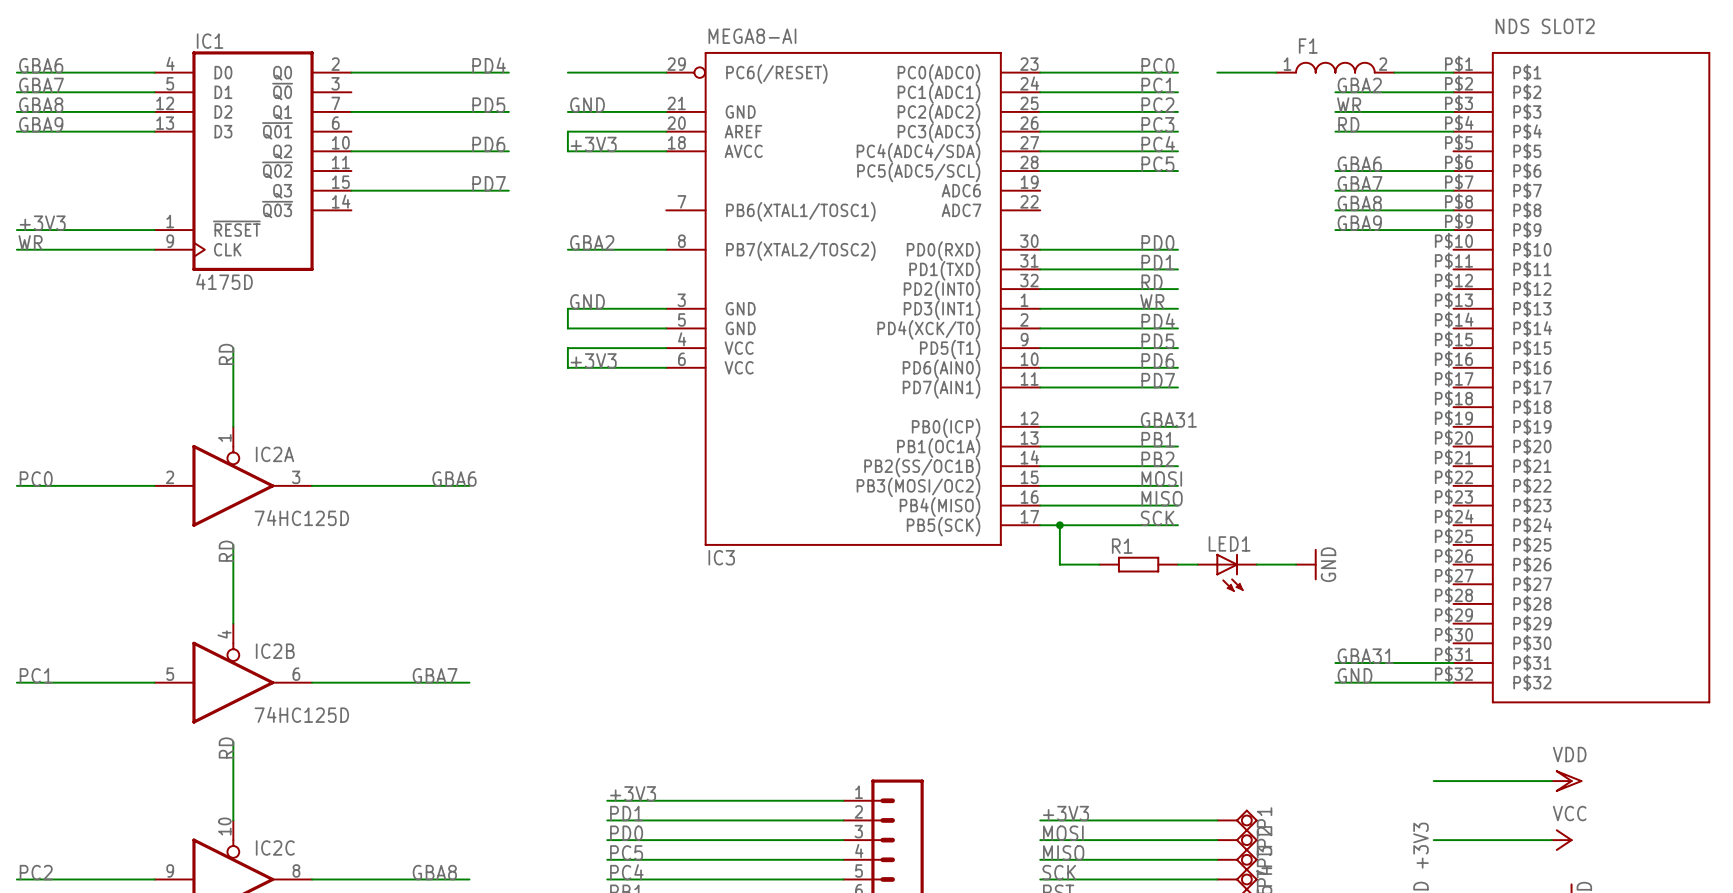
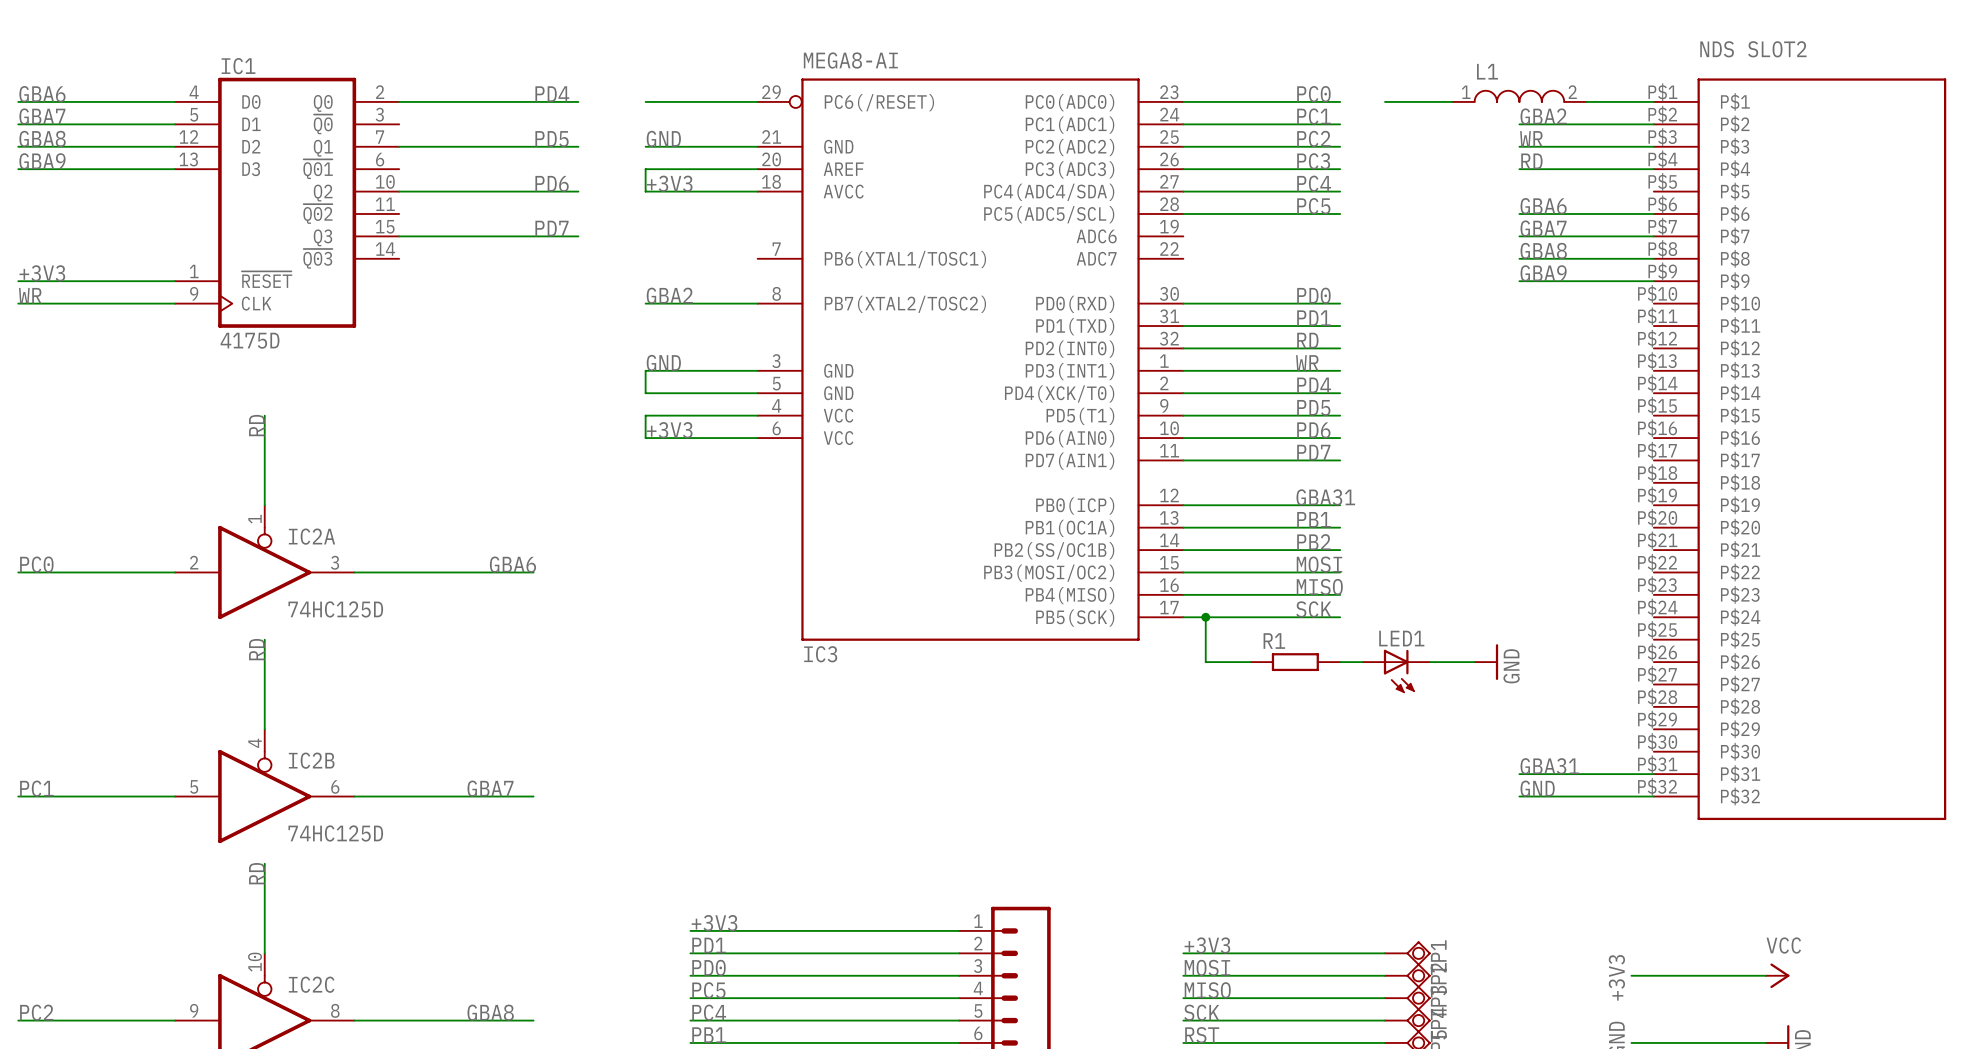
F1 name: F1 (1308, 46) -> L1 (1487, 71)
wire: (1433, 781) (1551, 781) -> none
power symbol: VDD (1567, 781) -> none

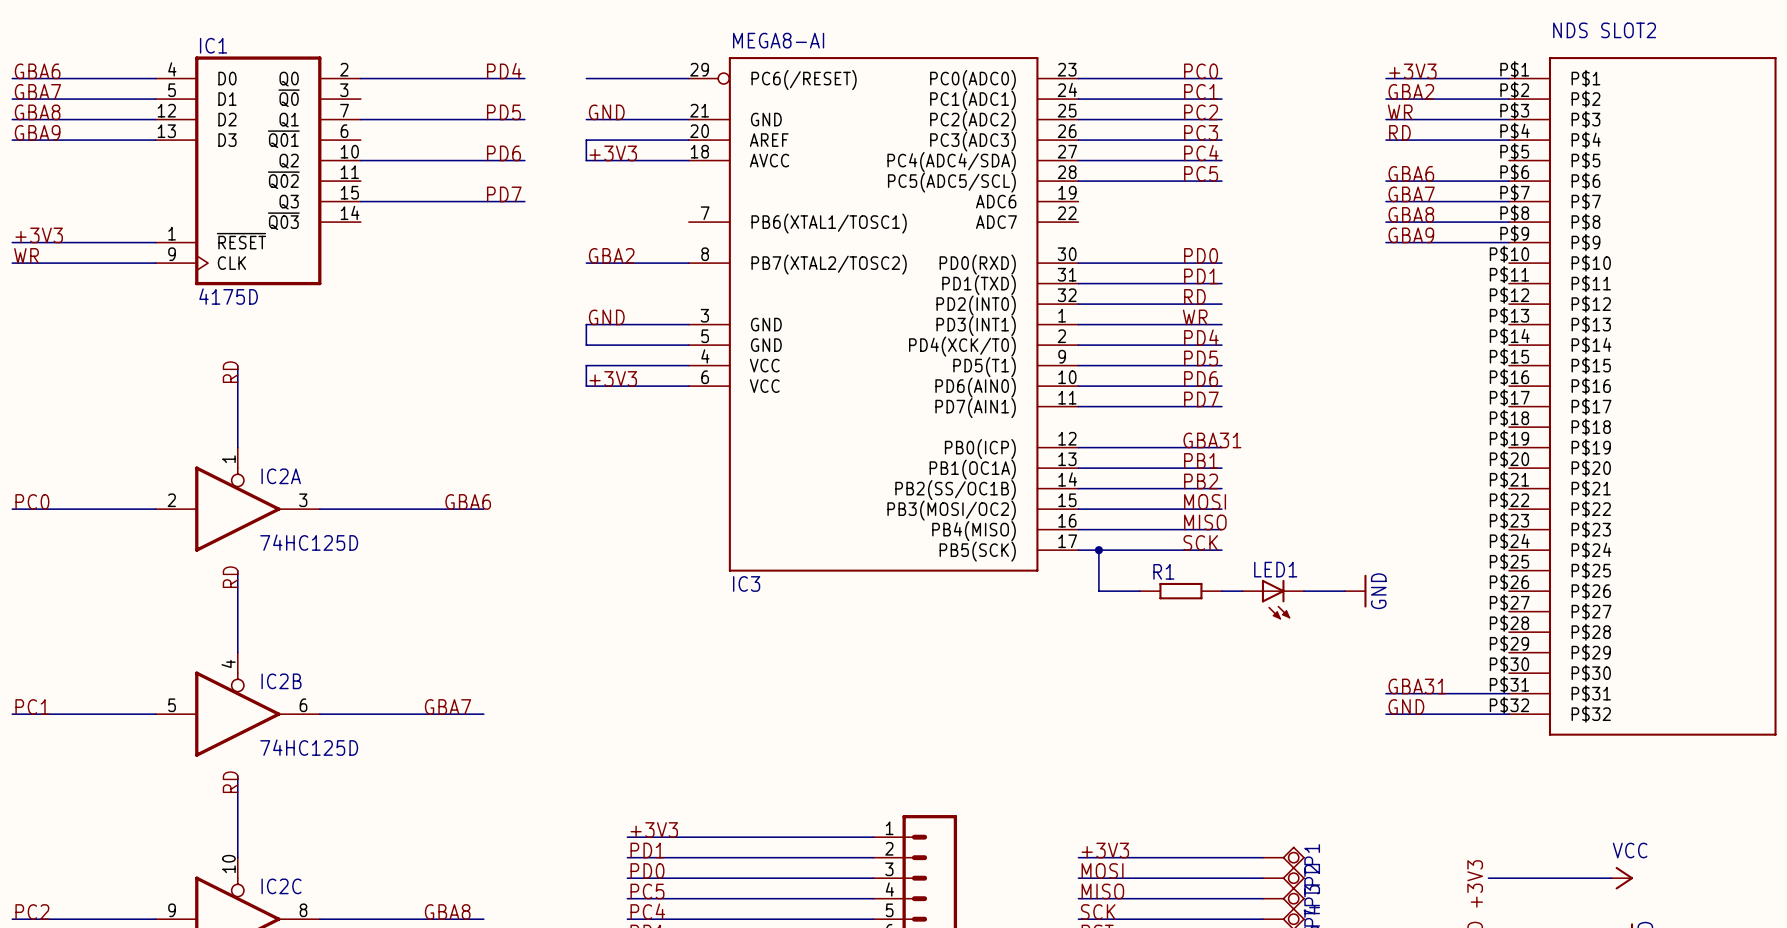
label: none -> +3V3 (1412, 71)
L1: (1519, 96) -> none
wire: (1384, 101) (1452, 101) -> (1385, 78) (1447, 78)

